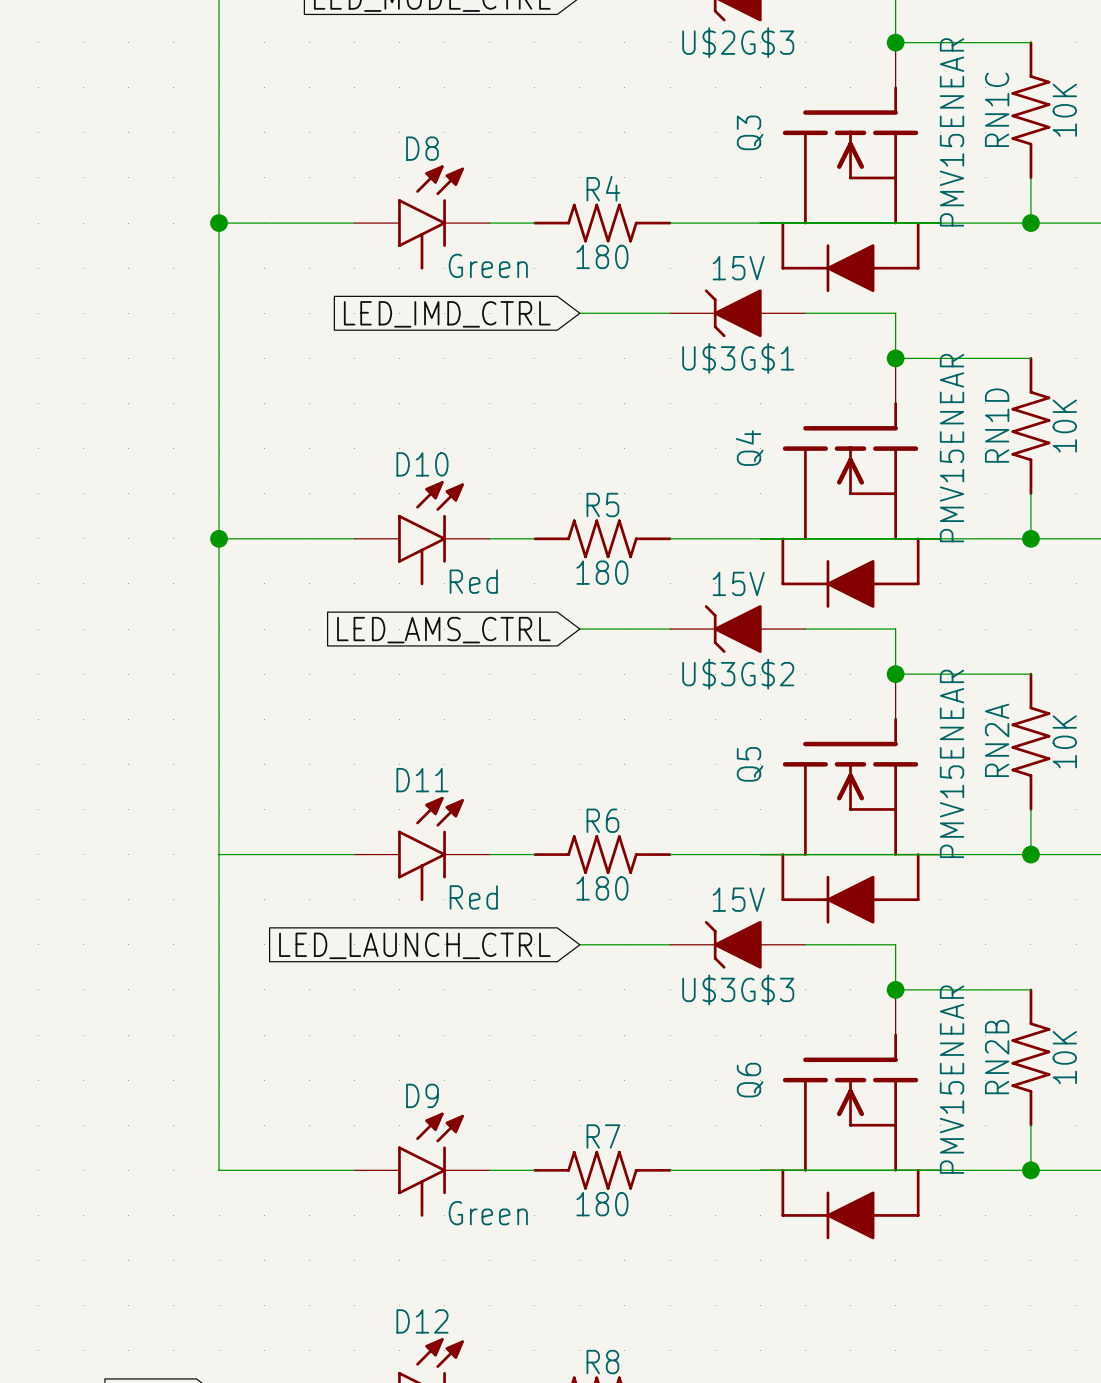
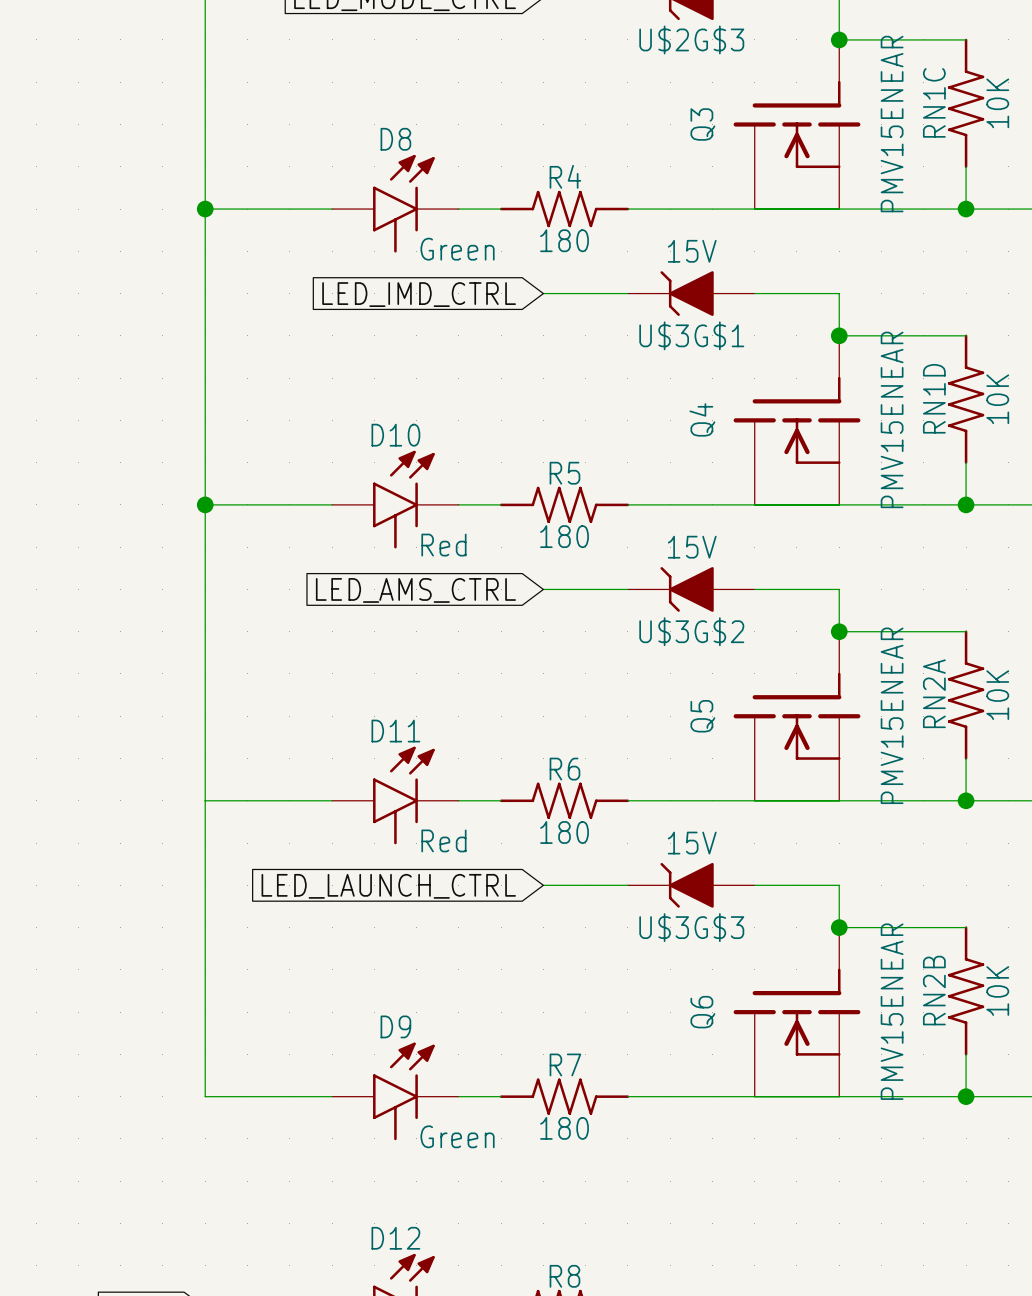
Q3 symbol: [760, 42, 941, 293] -> [733, 39, 861, 210]
Q4 symbol: [760, 358, 941, 608] -> [733, 335, 861, 505]
Q5 symbol: [760, 674, 941, 924] -> [733, 631, 861, 801]
Q6 symbol: [760, 989, 941, 1240] -> [733, 927, 861, 1097]

